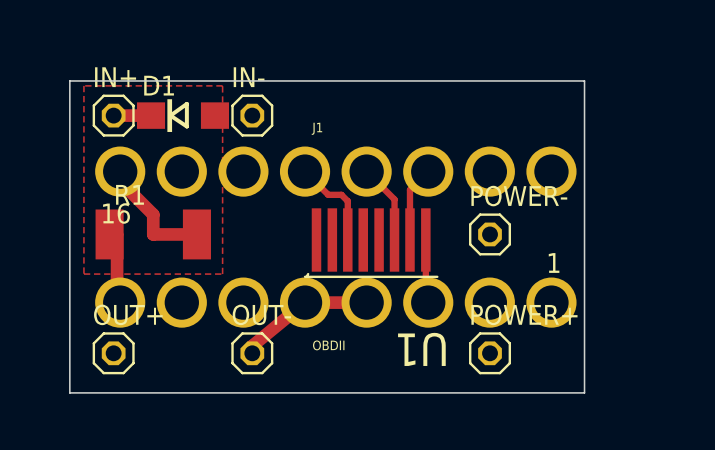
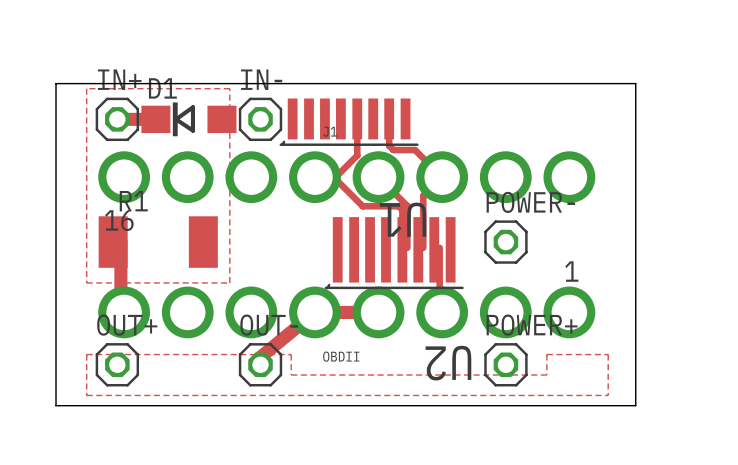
board edge: (69, 80) (69, 392) -> (72, 83) (56, 83) (56, 405) (72, 405)
board edge: (584, 80) (584, 392) -> (603, 83) (635, 83) (635, 405) (603, 405)
track: none -> (357, 118) (357, 155) (332, 180)
track: none -> (389, 118) (389, 145) (393, 150) (415, 150) (442, 177)
track: (120, 171) (120, 181) (153, 214) (153, 234) (196, 234) -> none
track: (308, 175) (328, 194) (341, 194) (347, 201) (347, 239) -> (318, 180) (337, 180) (362, 206) (398, 206) (402, 210) (402, 249)
U1 footprint: [303, 208, 439, 279] -> [279, 98, 419, 146]
U2: none -> (394, 253)
zone outline: none -> (86, 354) (86, 395) (608, 395) (608, 354) (546, 354) (546, 375) (291, 375) (291, 354) (86, 354)

